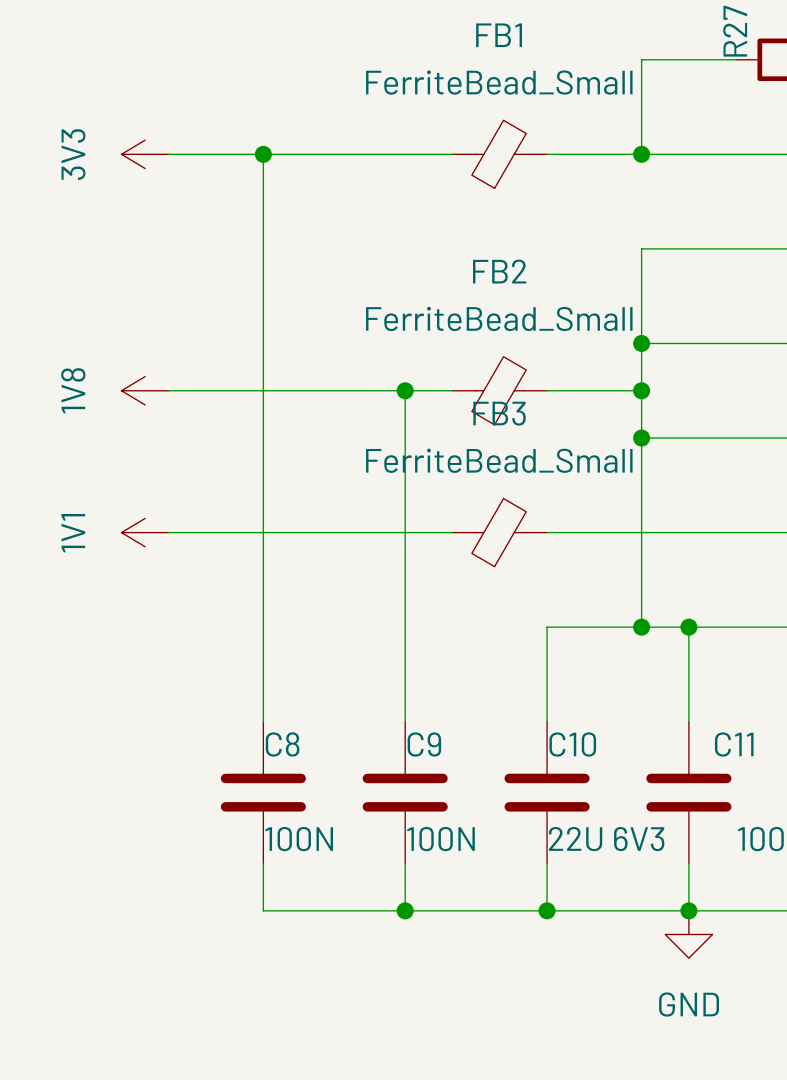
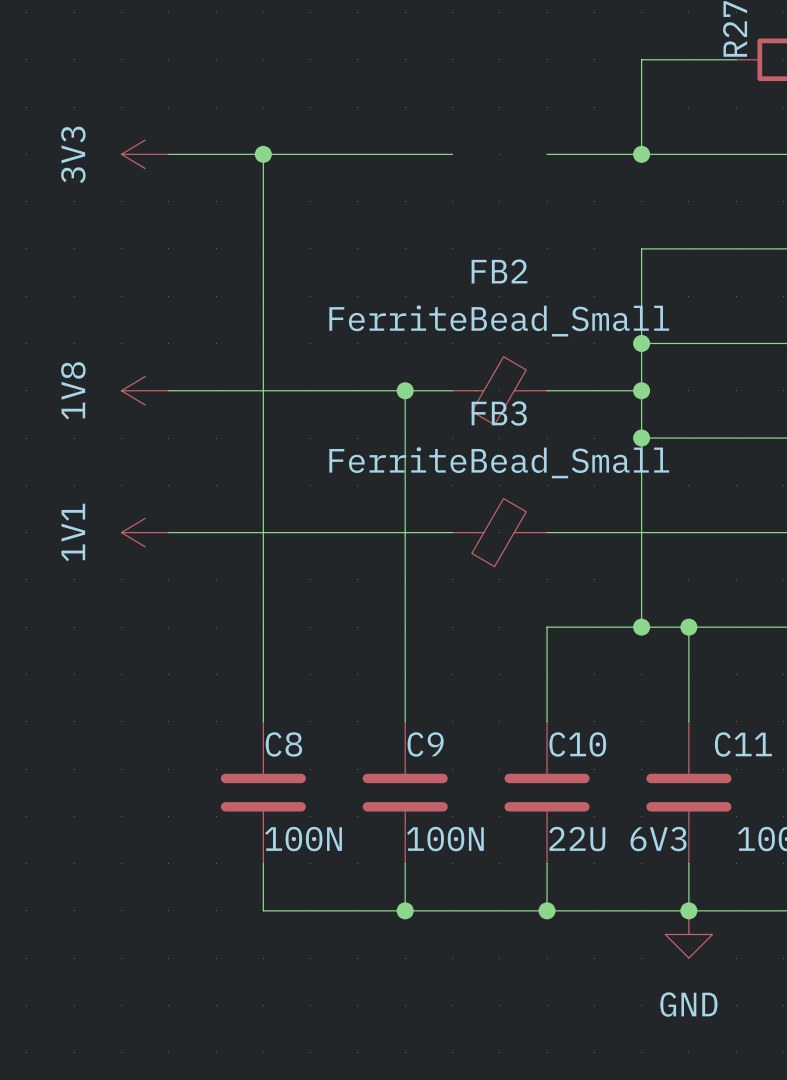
FB1: FerriteBead_Small (499, 154) -> none

